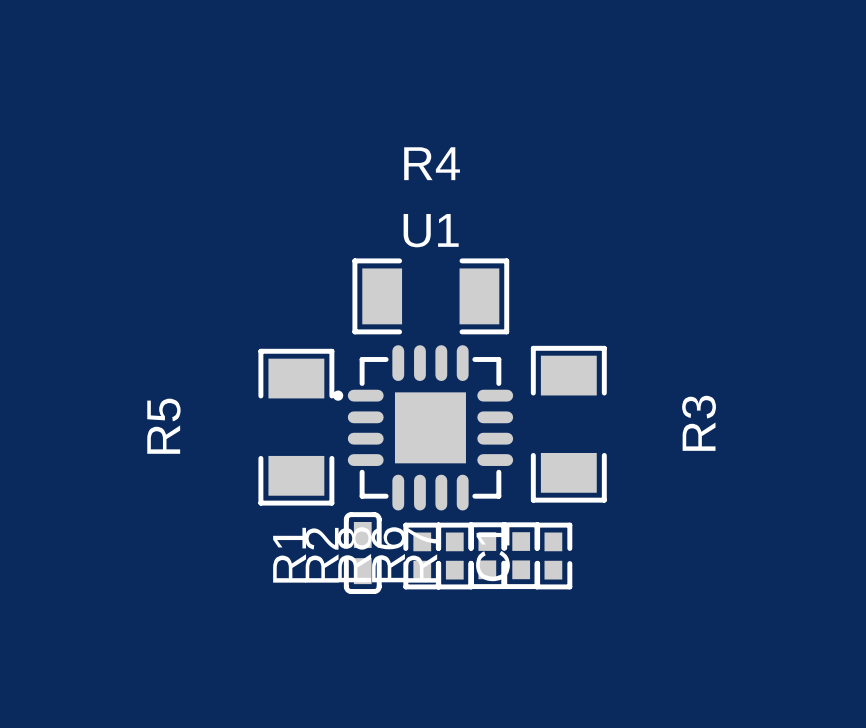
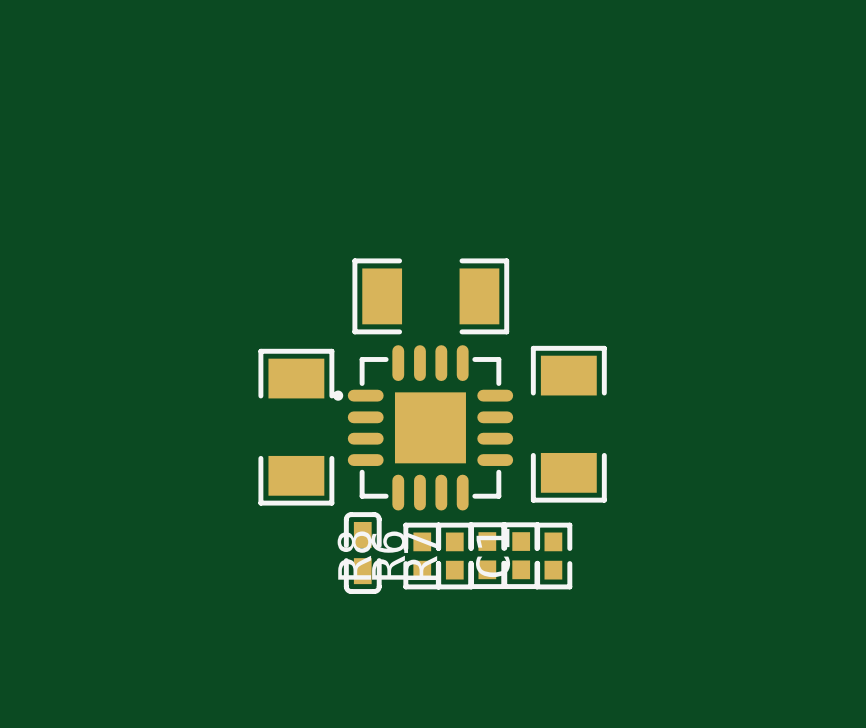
R4 name: R4 (432, 163) -> none
U1 name: U1 (431, 230) -> none
R3 name: R3 (699, 423) -> none
R5 name: R5 (163, 426) -> none
R1 name: R1 (289, 555) -> none
R2 name: R2 (321, 555) -> none

